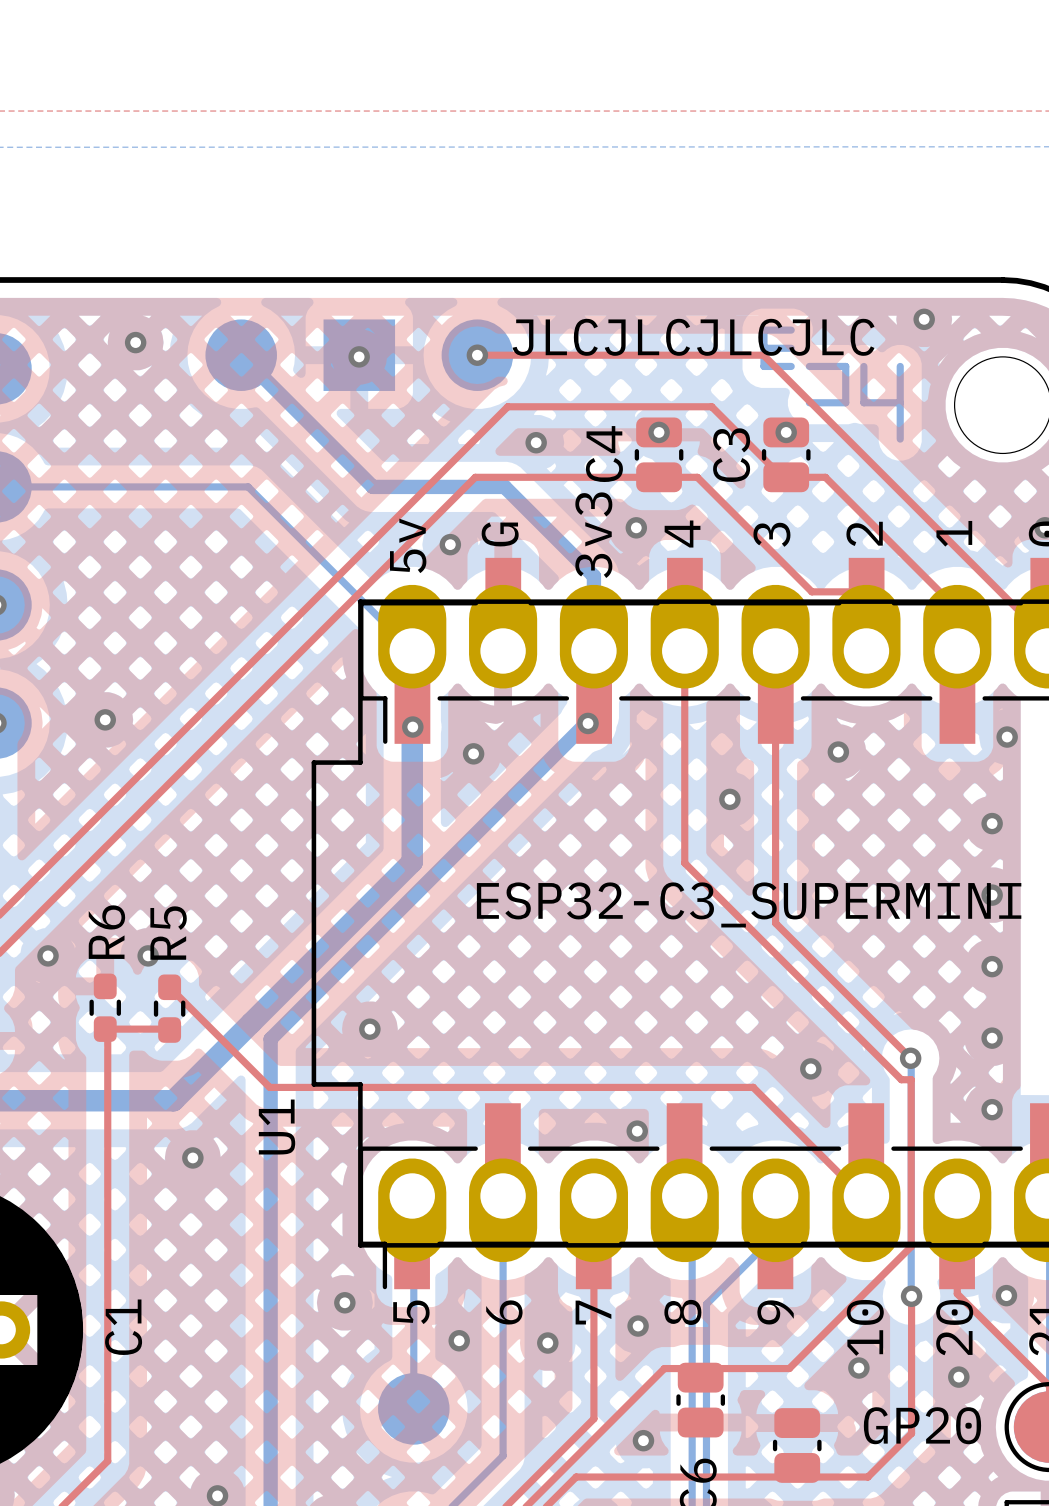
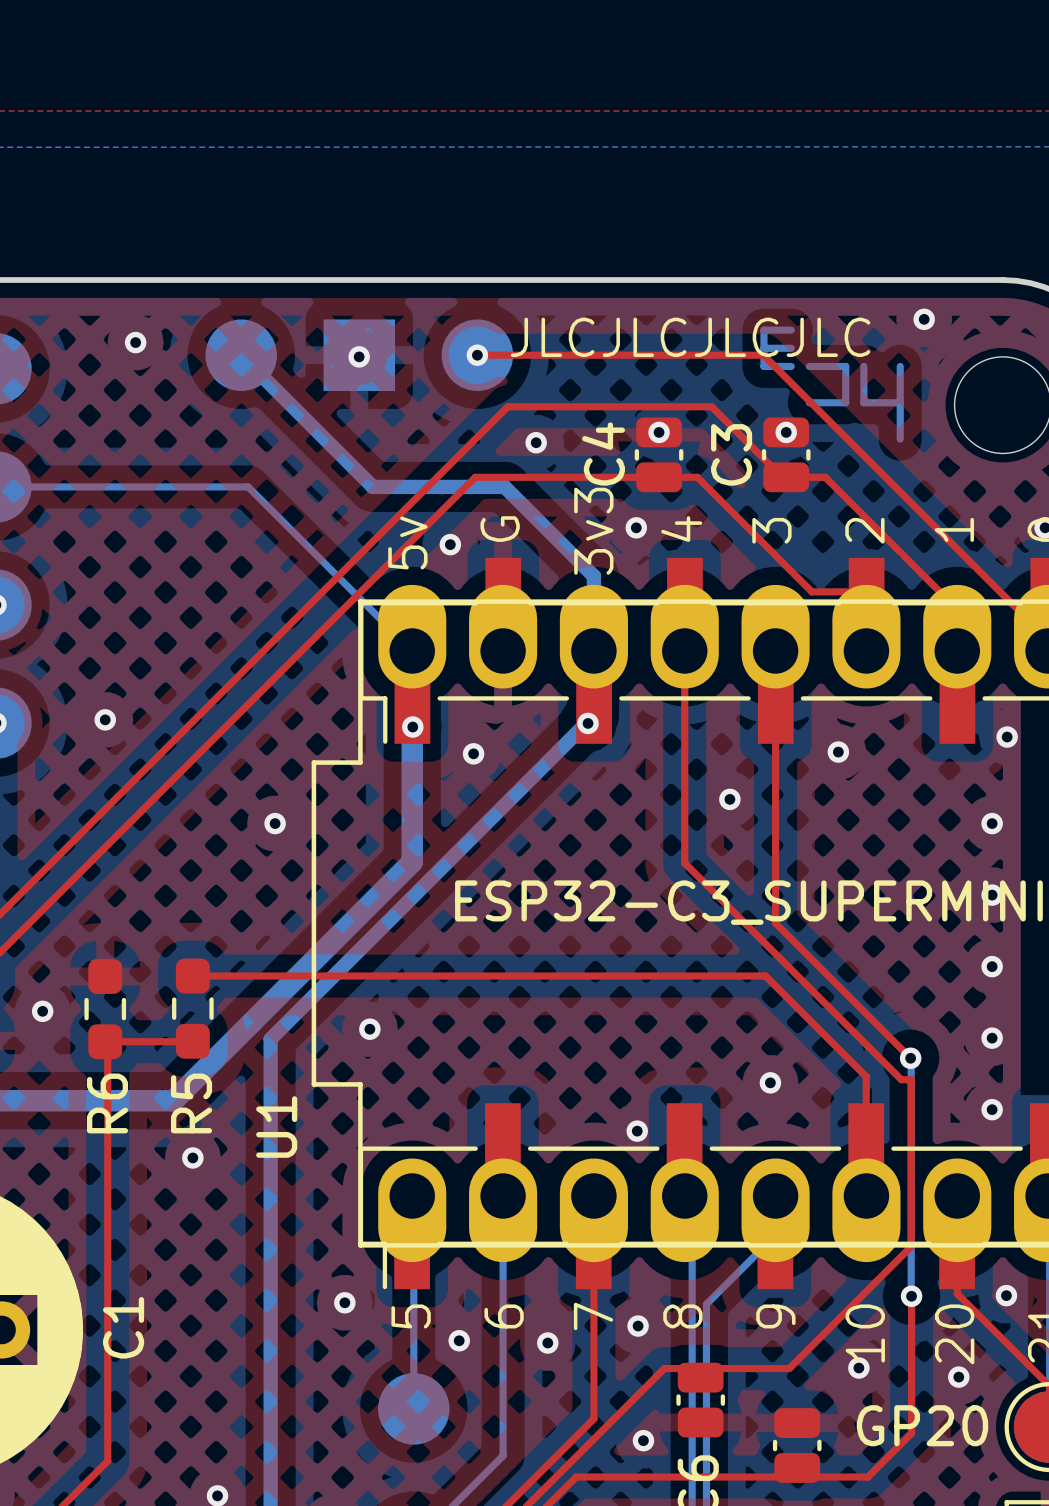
via: none -> (275, 823)
R6 name position: R6 (106, 932) -> R6 (107, 1103)
R5 name position: R5 (168, 933) -> R5 (191, 1103)
via position: (48, 955) -> (42, 1011)
via: (148, 955) -> none
R6 footprint: [89, 973, 121, 1042] -> [84, 959, 127, 1060]
R5 footprint: [153, 974, 186, 1043] -> [172, 958, 214, 1059]
top track: none -> (192, 976) (765, 976) (866, 1076) (866, 1137)
top track: (169, 987) (269, 1087) (753, 1087) (861, 1196) (866, 1196) -> none
top track: (105, 1029) (169, 1030) -> none
top track: none -> (105, 1041) (192, 1041)
via position: (810, 1068) -> (770, 1082)

